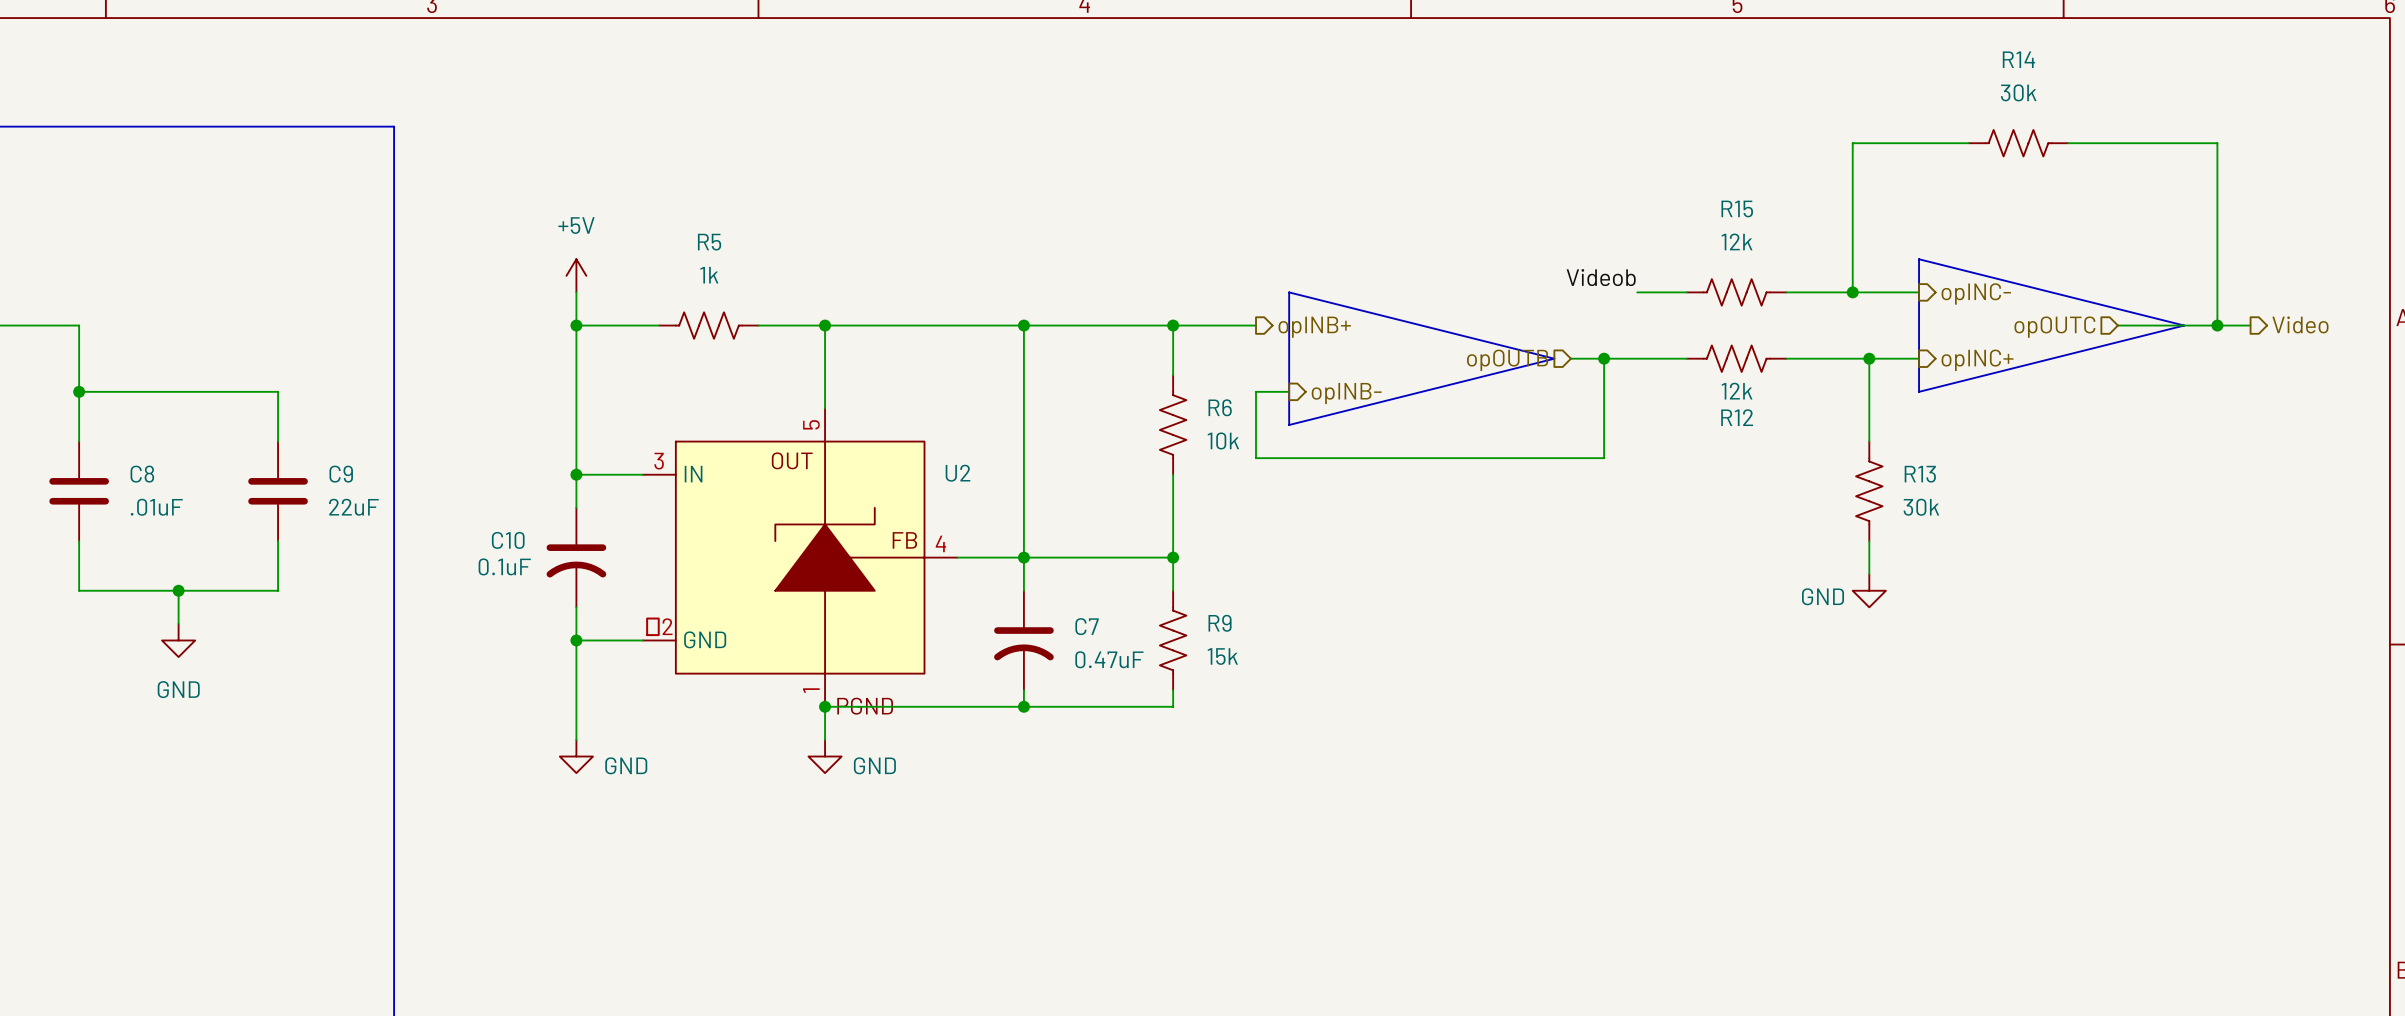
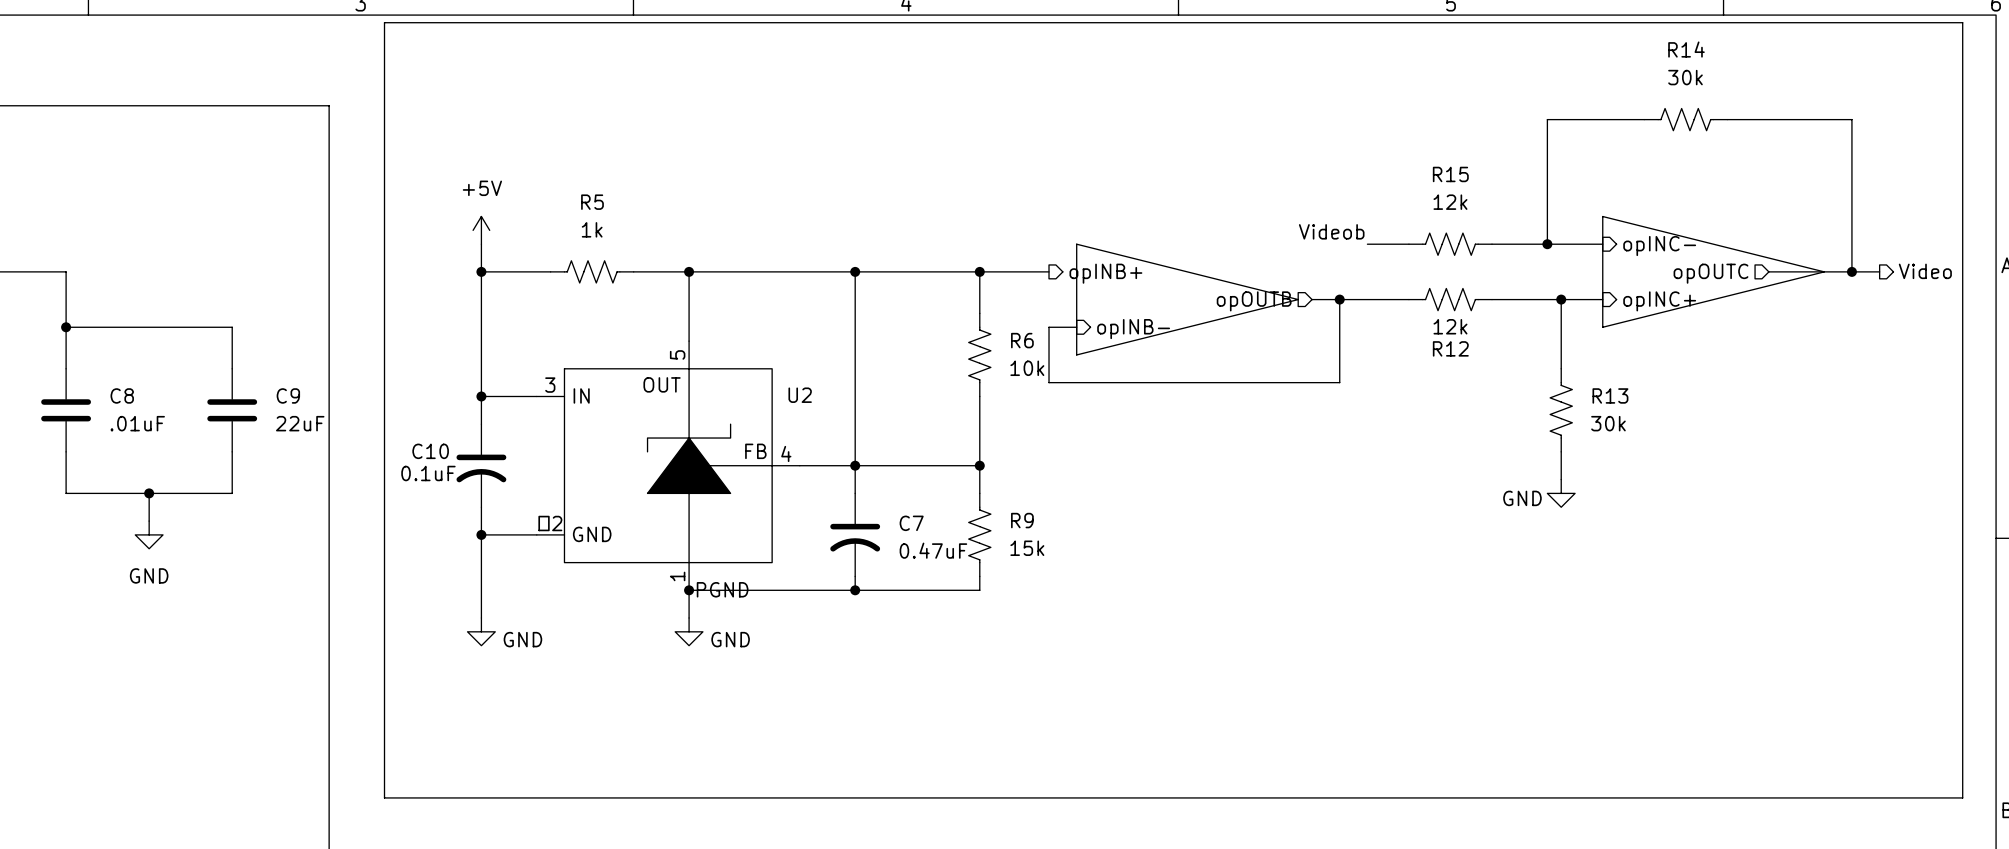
line: none -> (384, 22) (1962, 22) (1962, 797) (384, 797) (384, 22)

